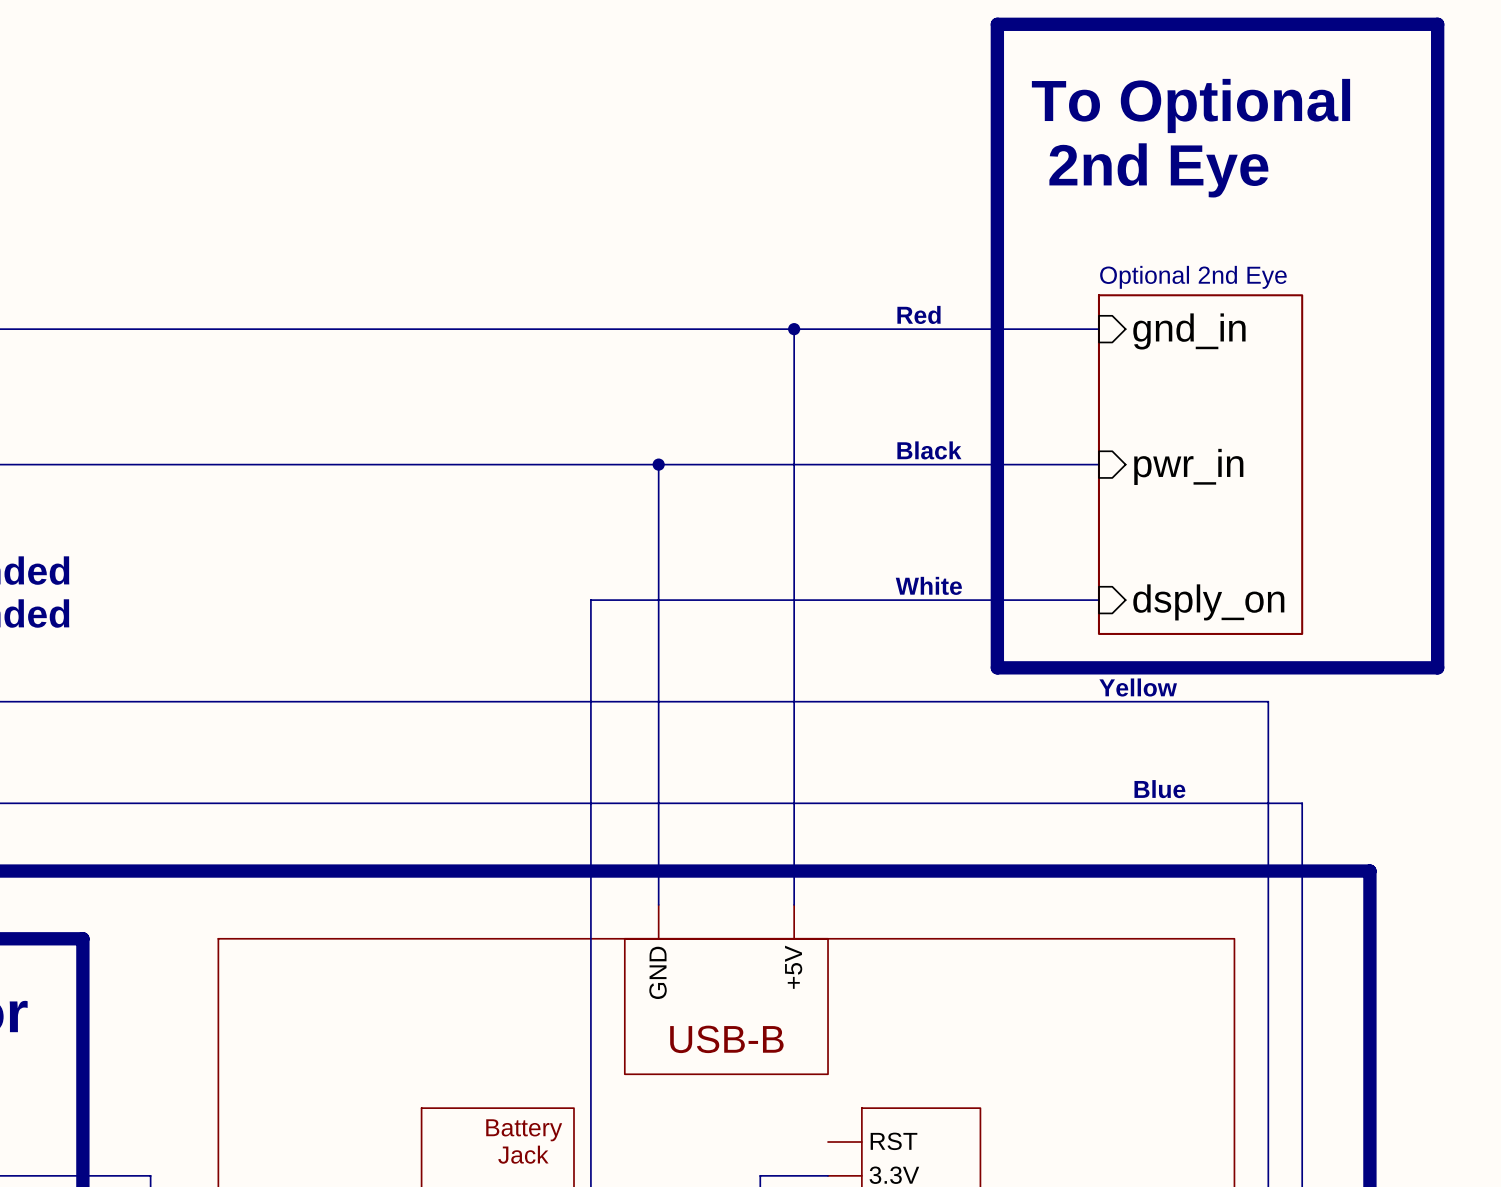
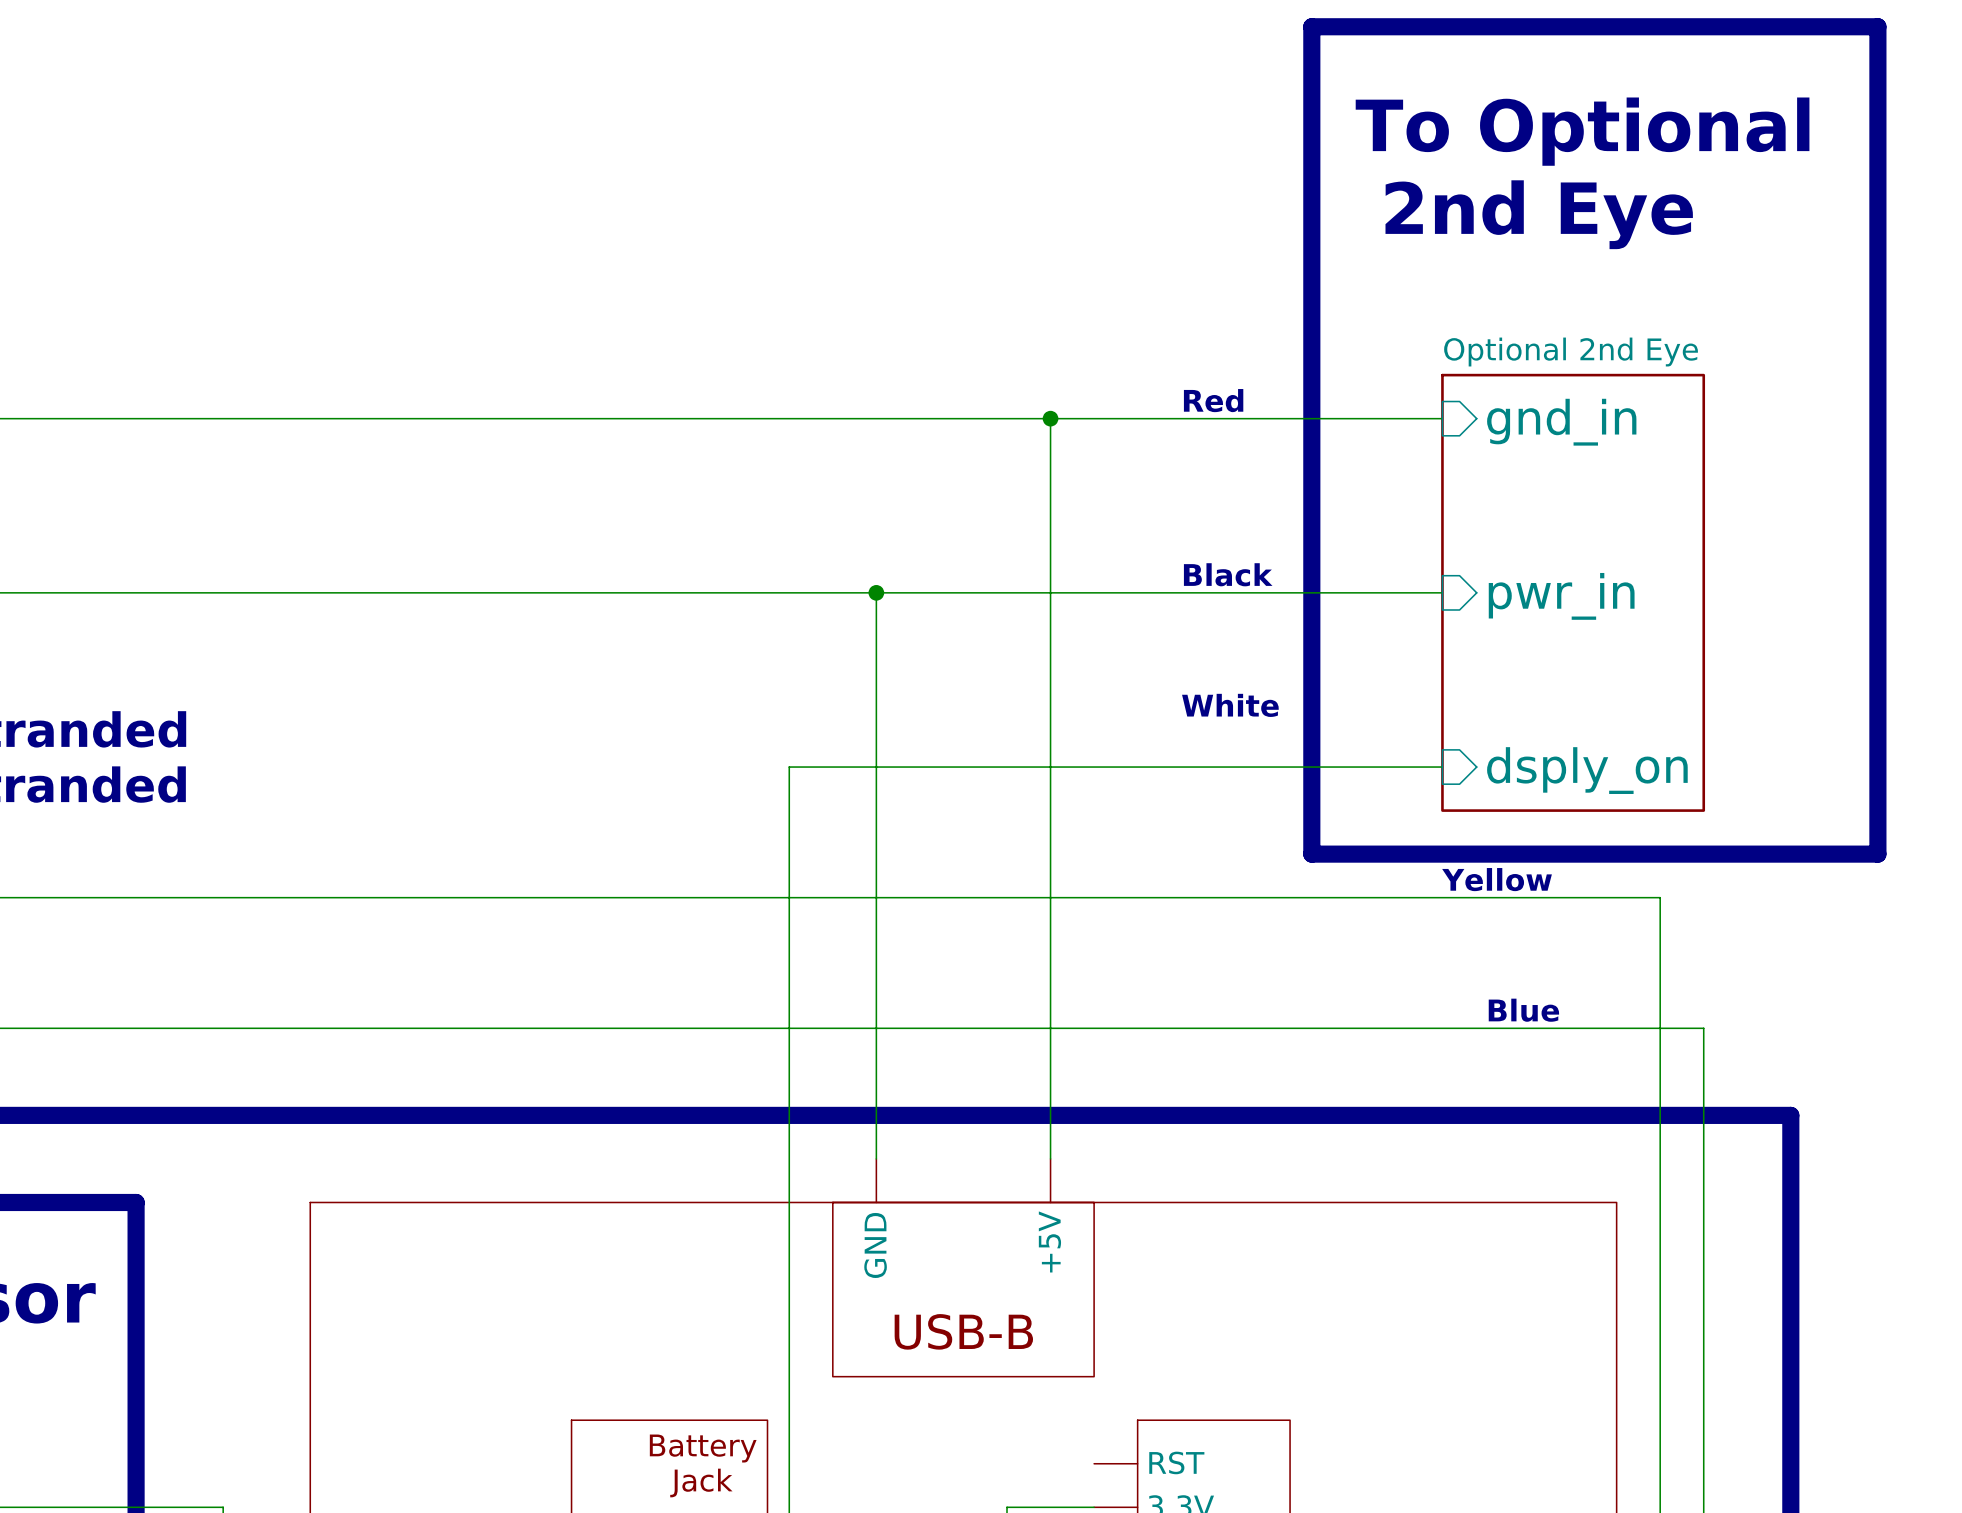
text position: White (928, 585) -> White (1230, 705)

